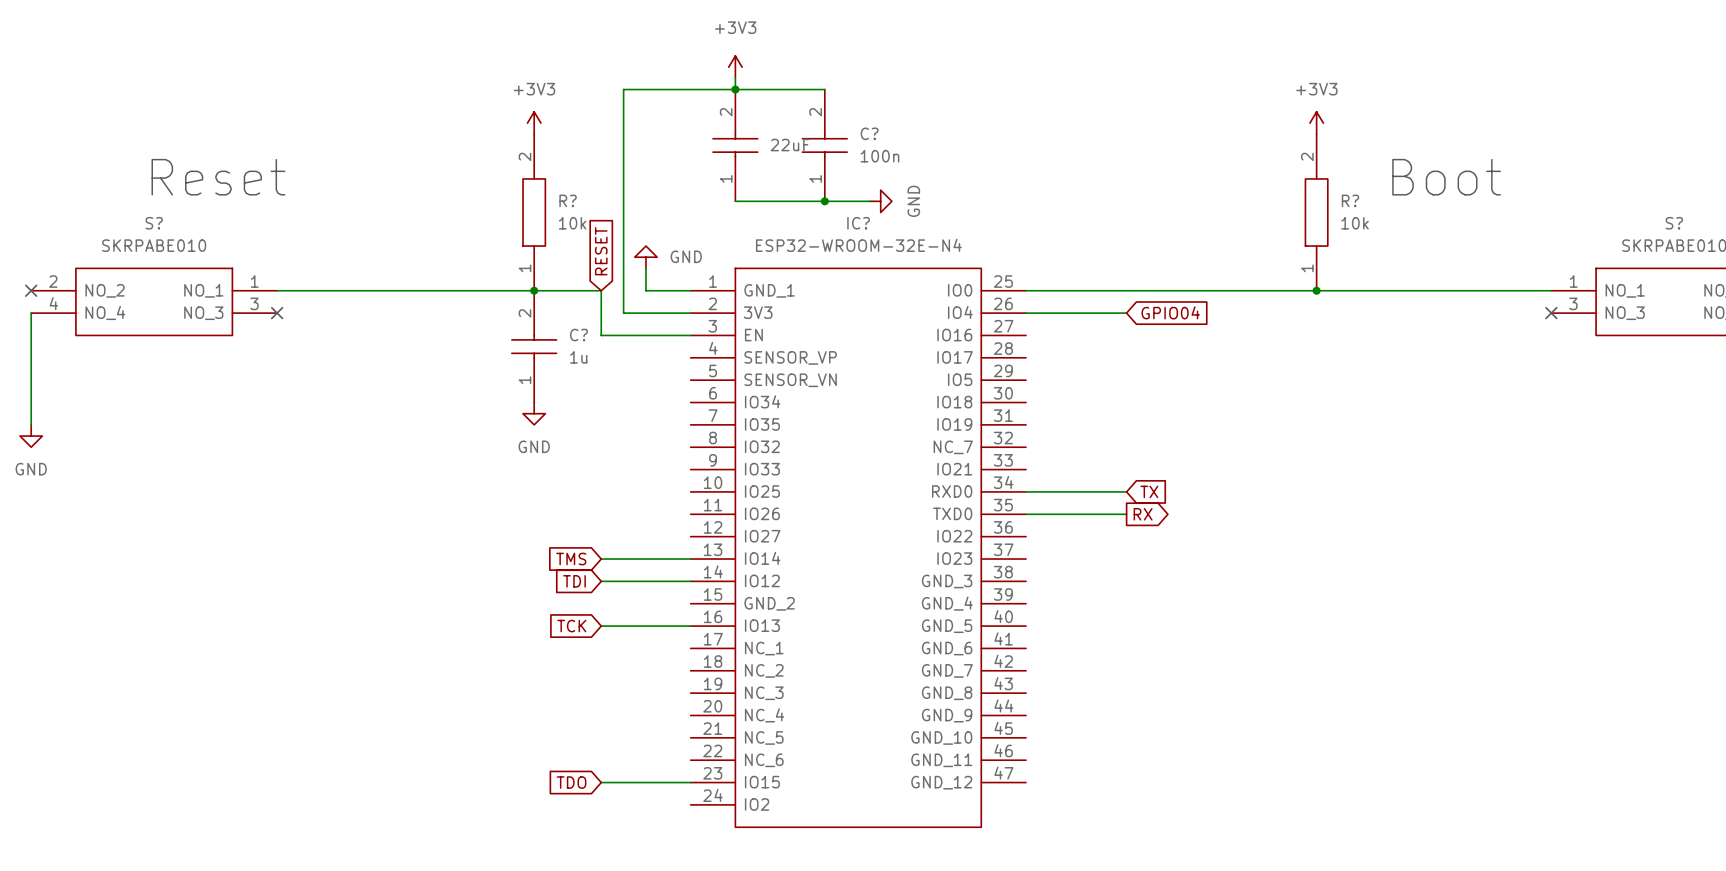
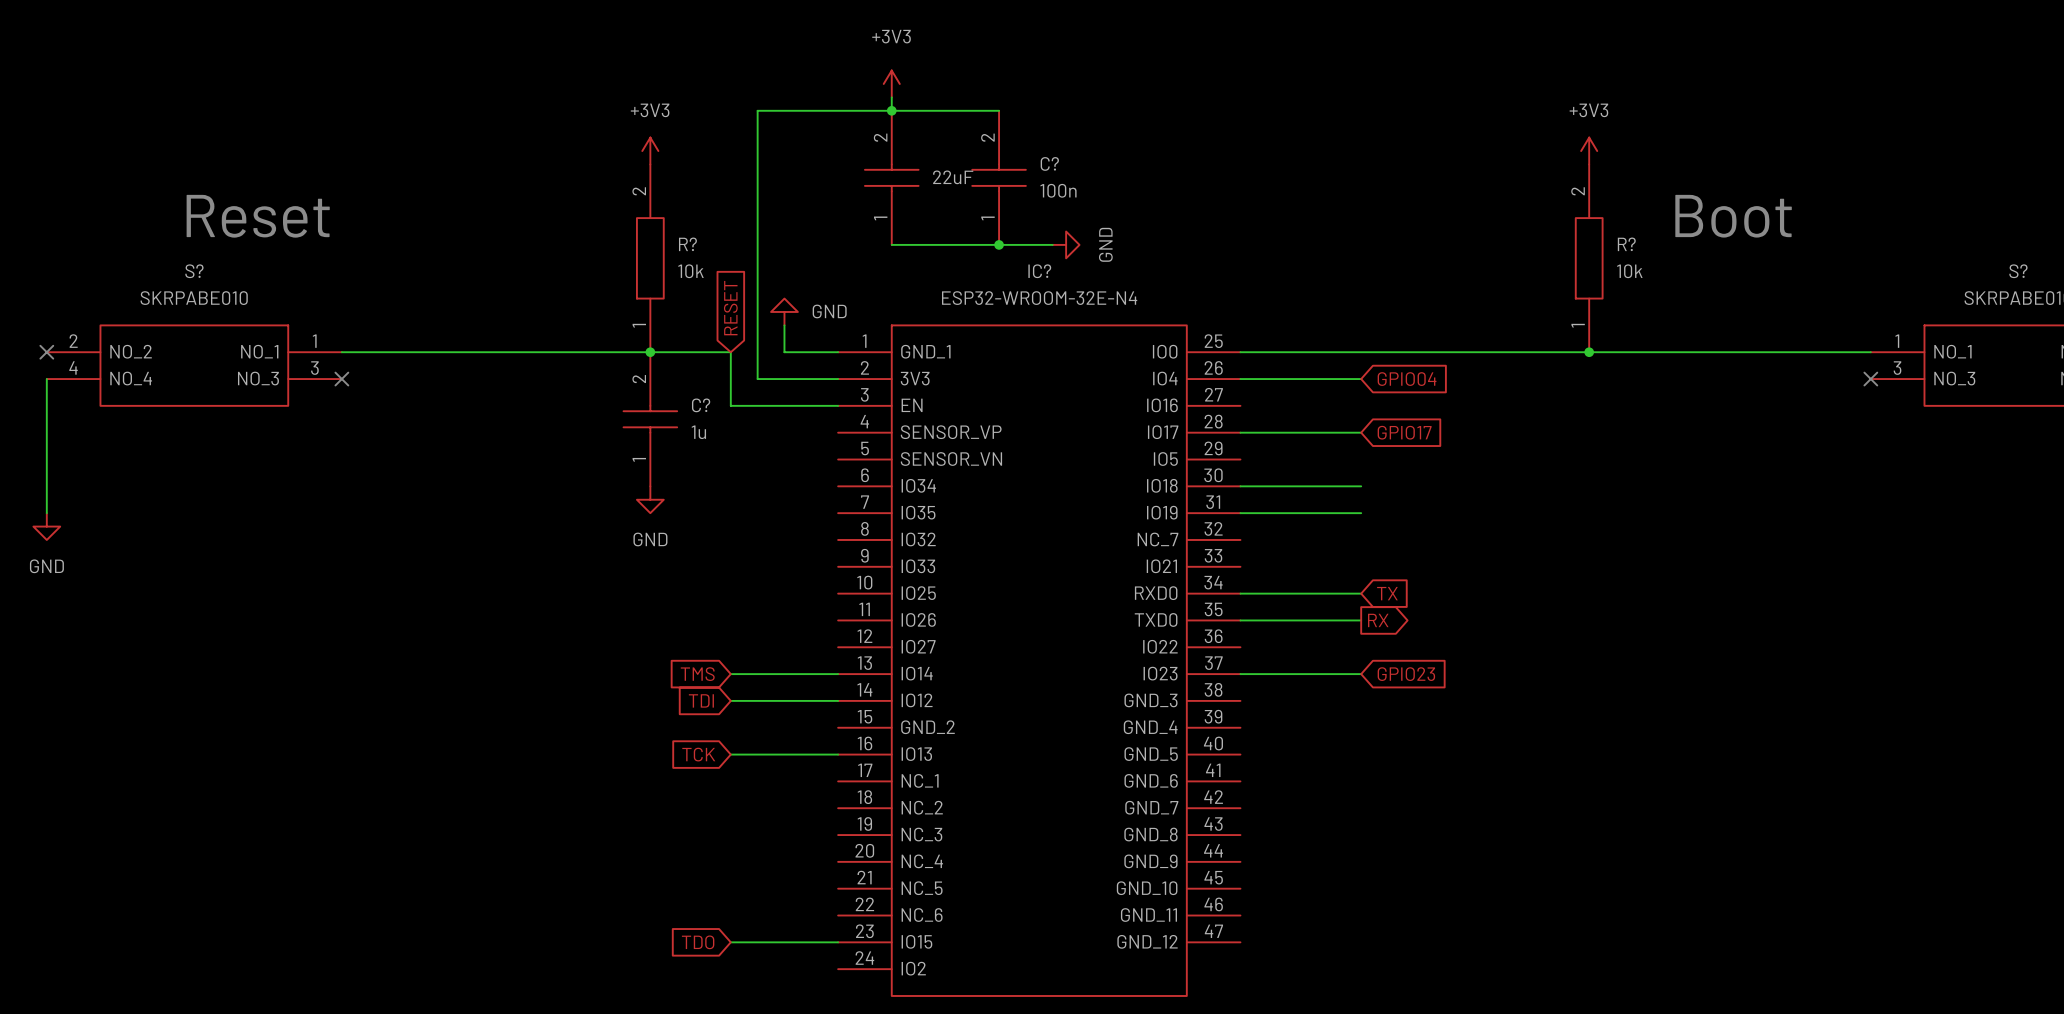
wire: none -> (1240, 432) (1361, 432)
global label: none -> GPIO17 (1404, 432)
wire: none -> (1240, 486) (1361, 486)
wire: none -> (1240, 513) (1361, 513)
wire: none -> (1240, 674) (1361, 674)
global label: none -> GPIO23 (1406, 674)

